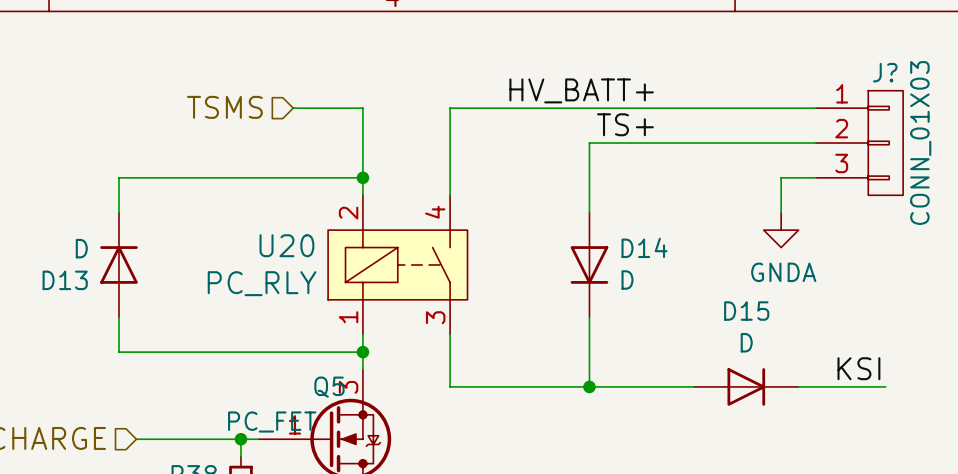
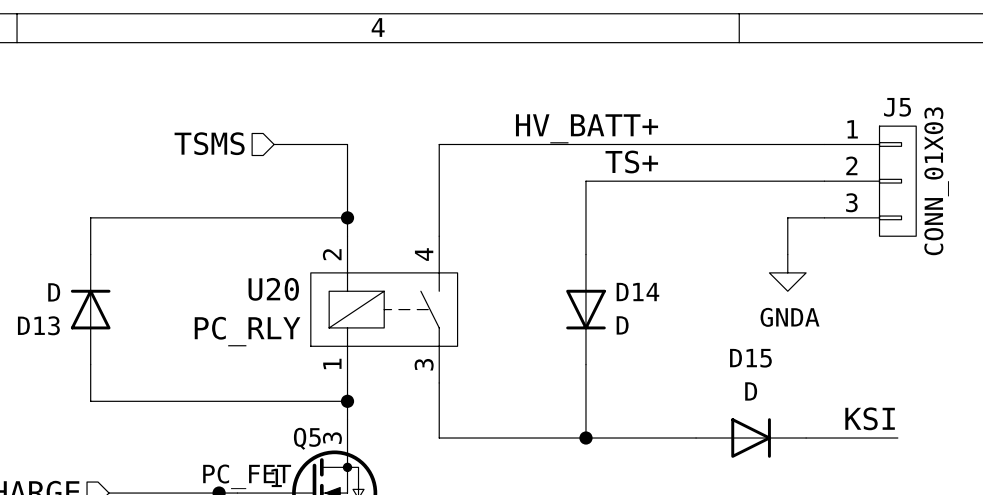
J? name: J? (885, 72) -> J5 (897, 107)

